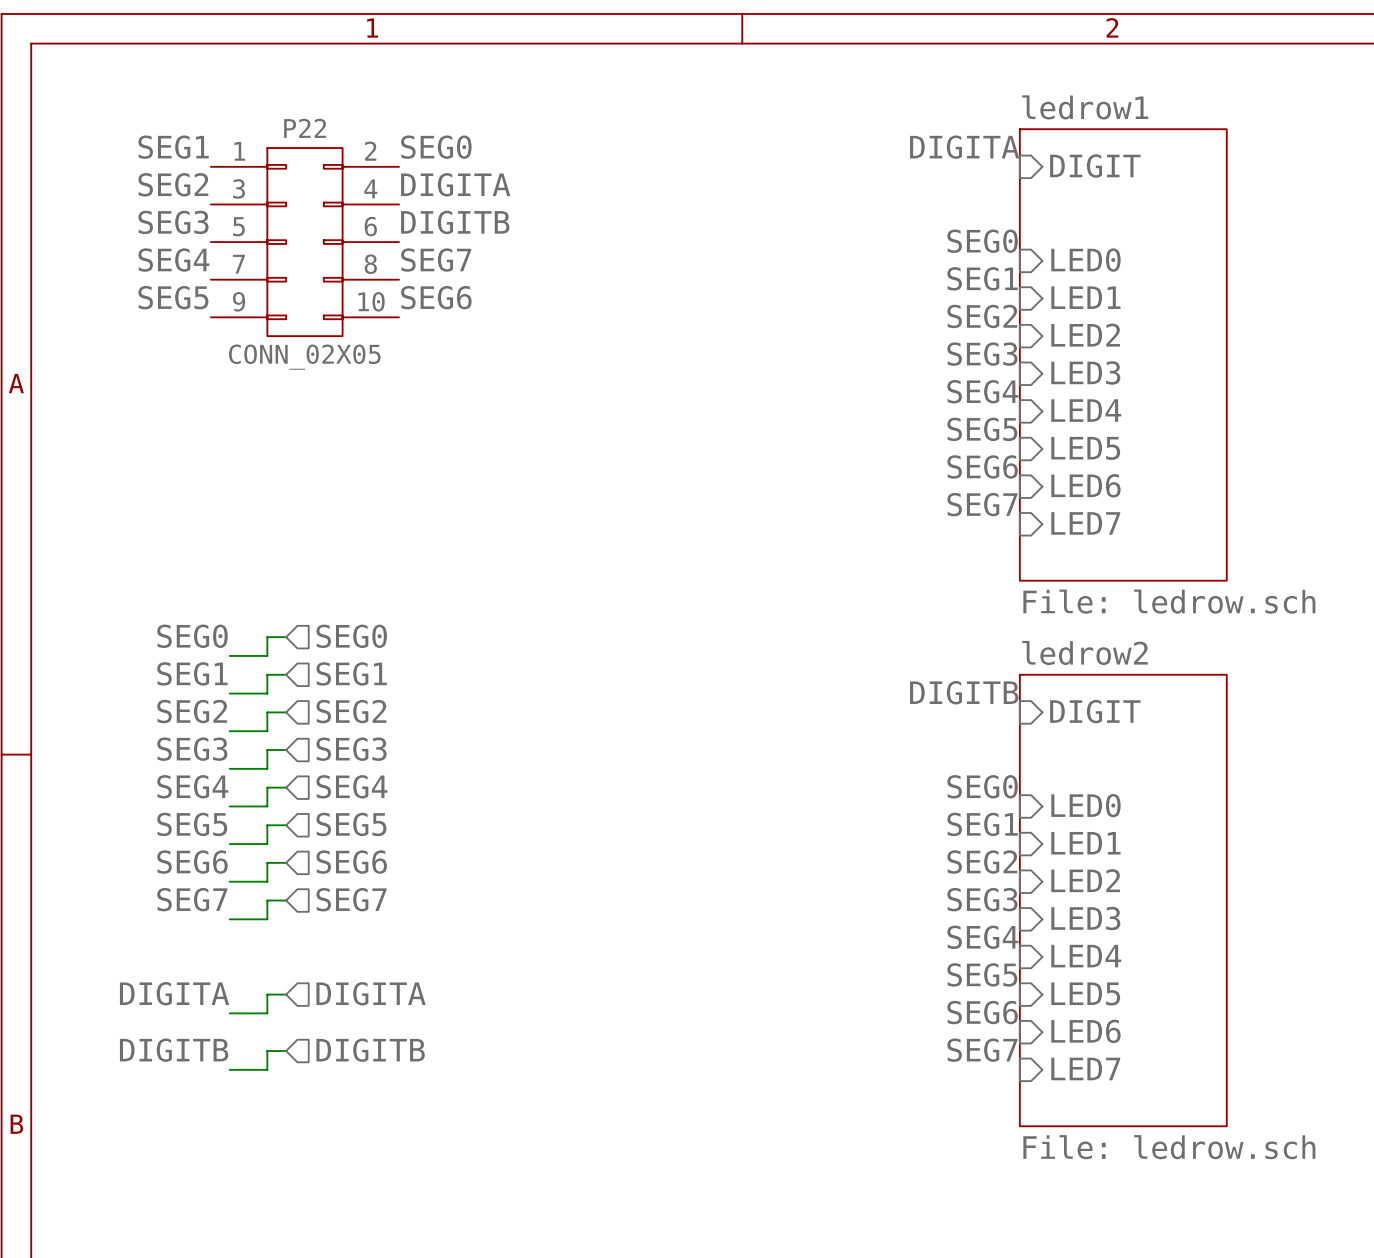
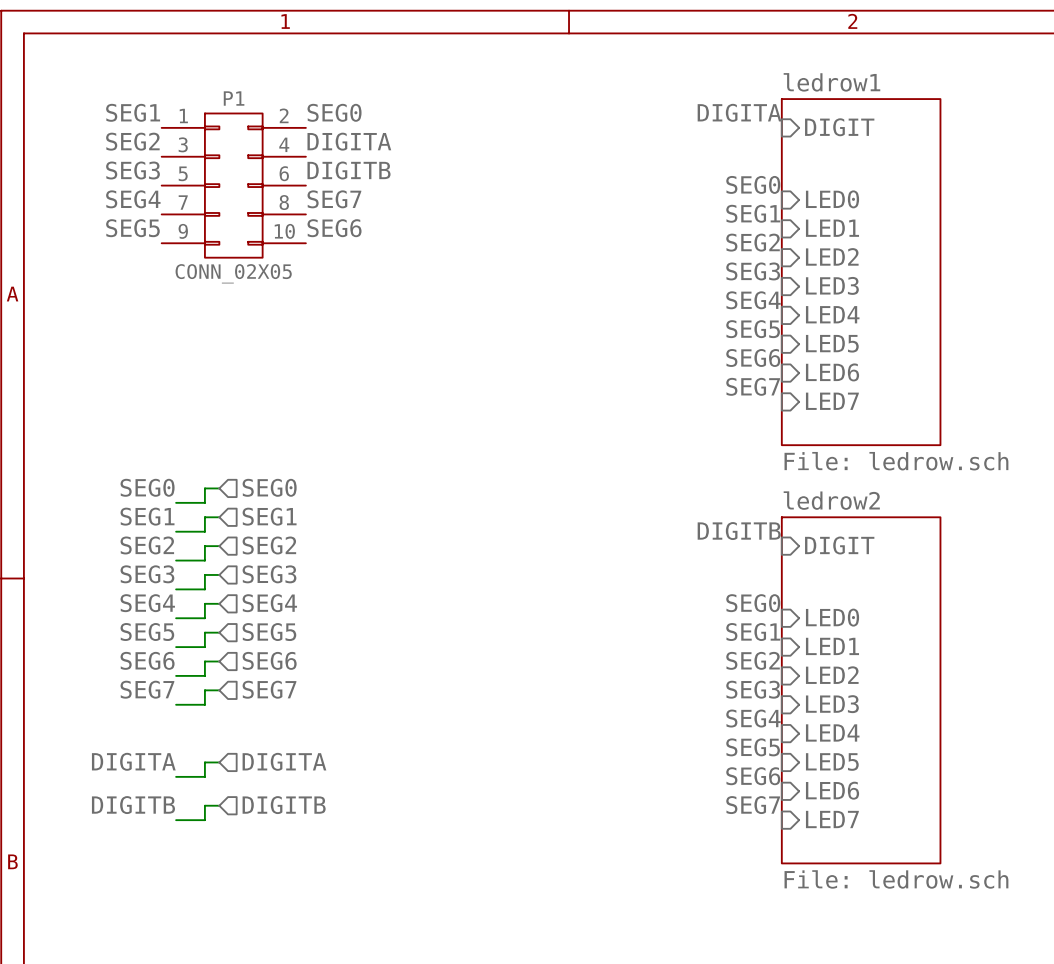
P22 name: P22 (305, 128) -> P1 (234, 98)

